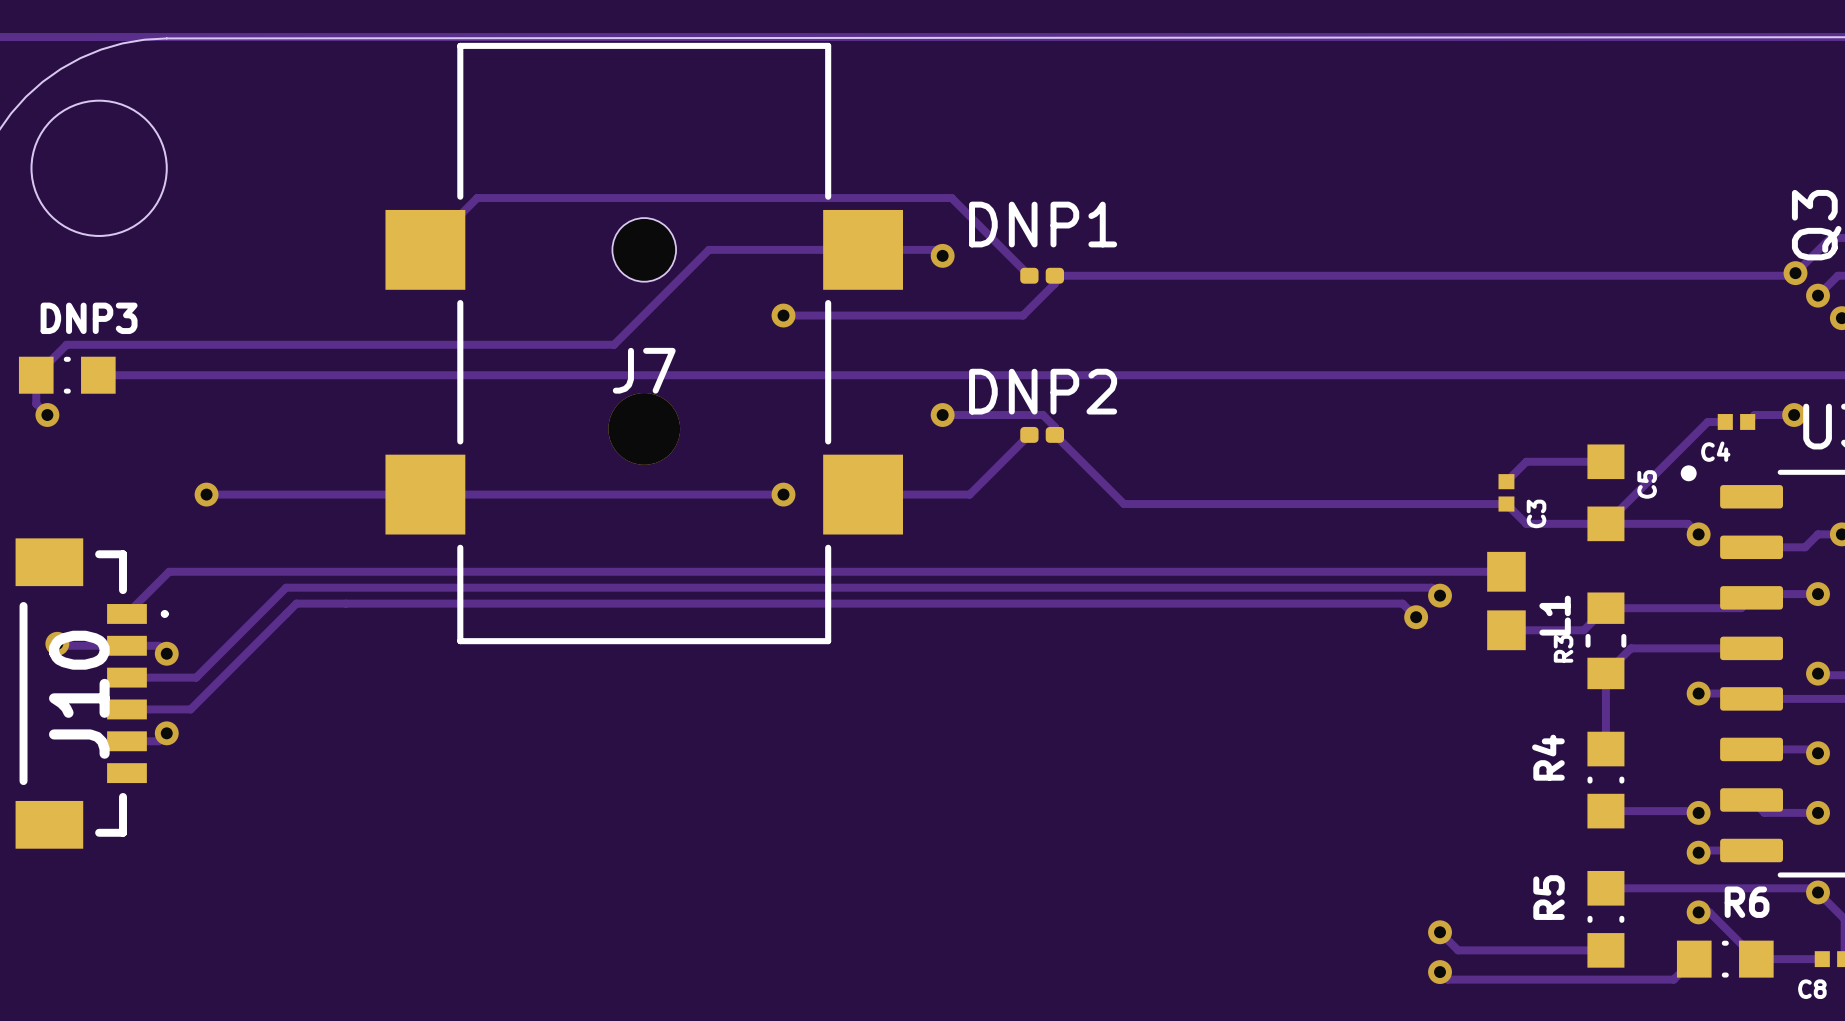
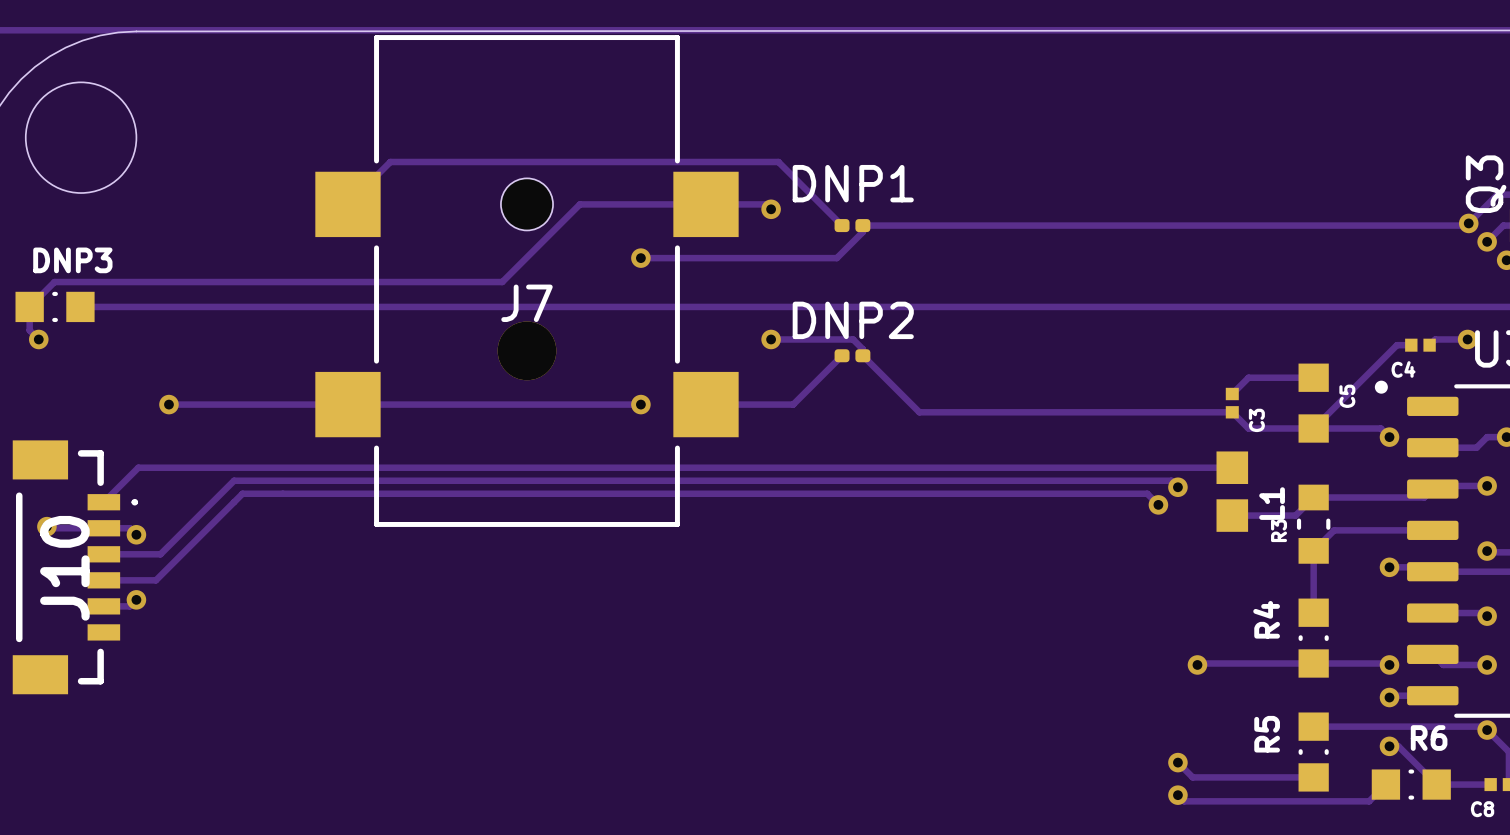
track: none -> (1313, 663) (1197, 664)
via: none -> (1197, 664)

